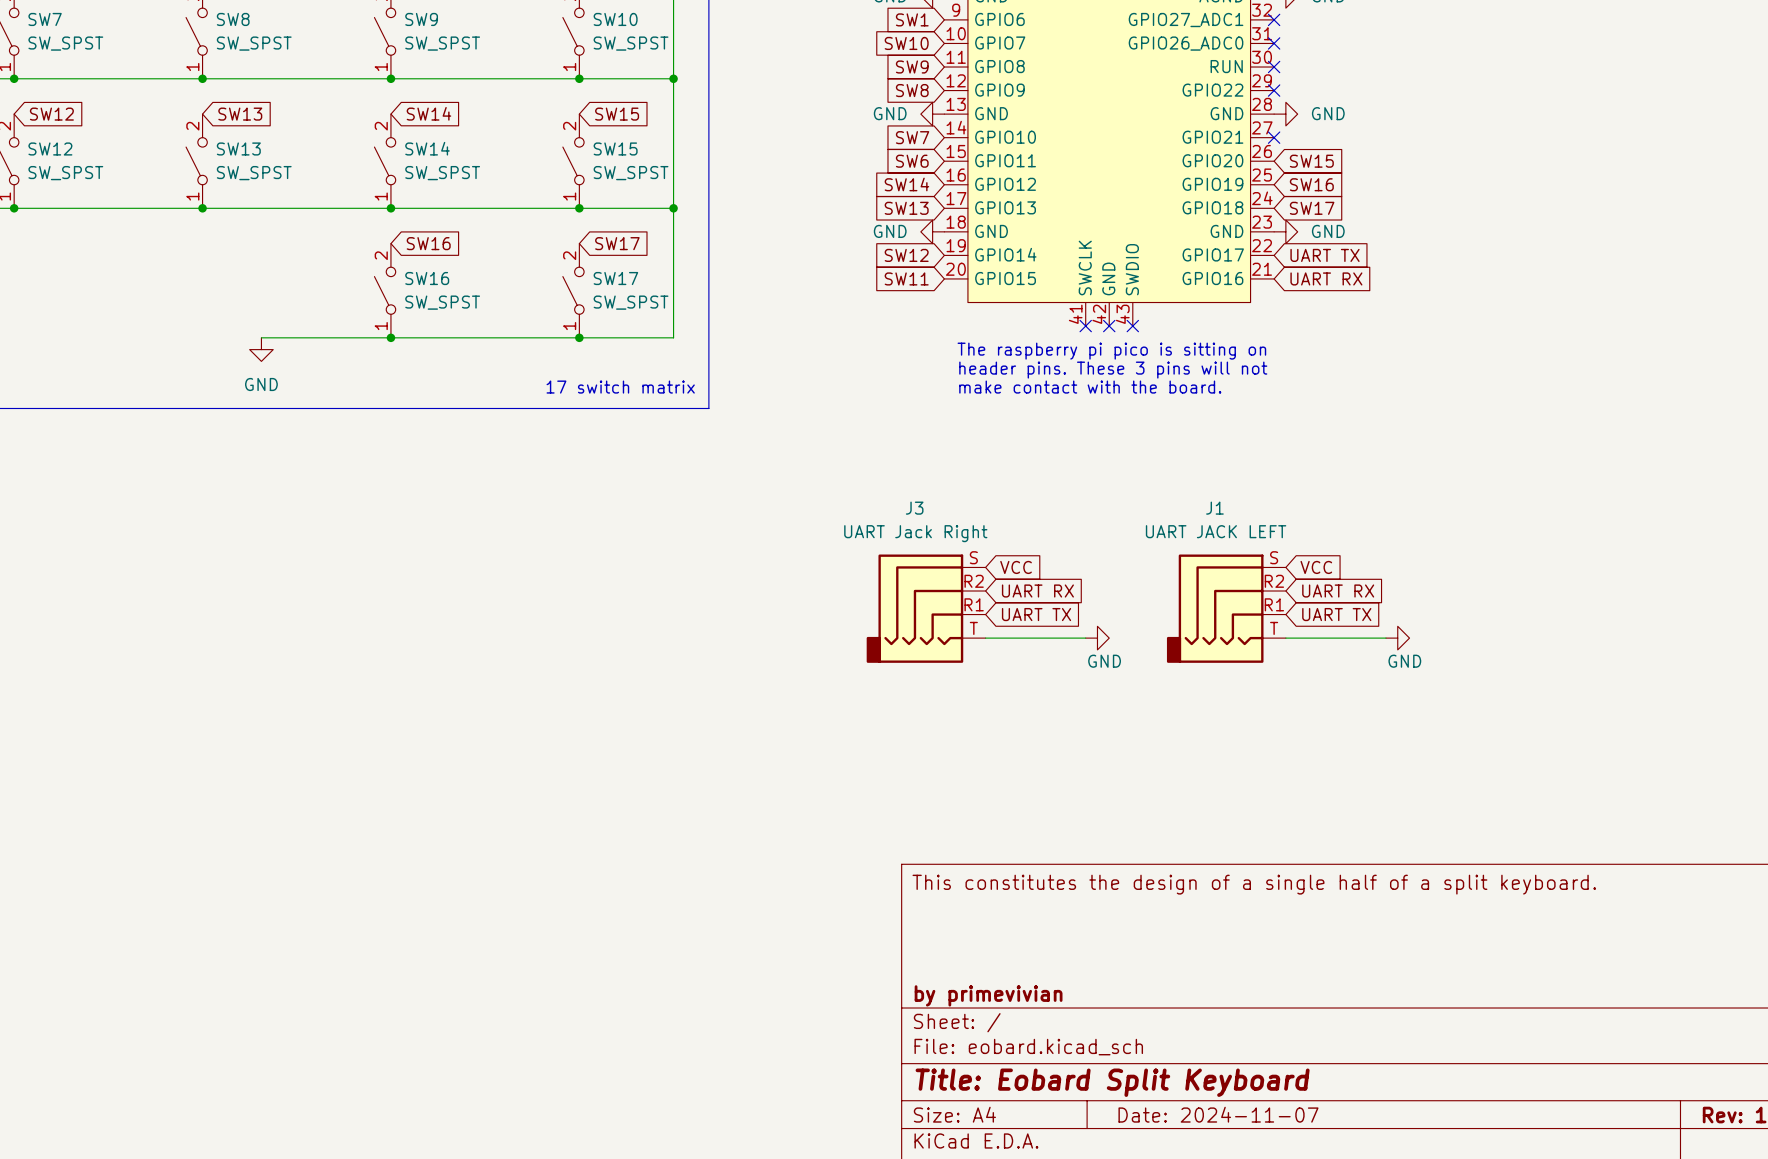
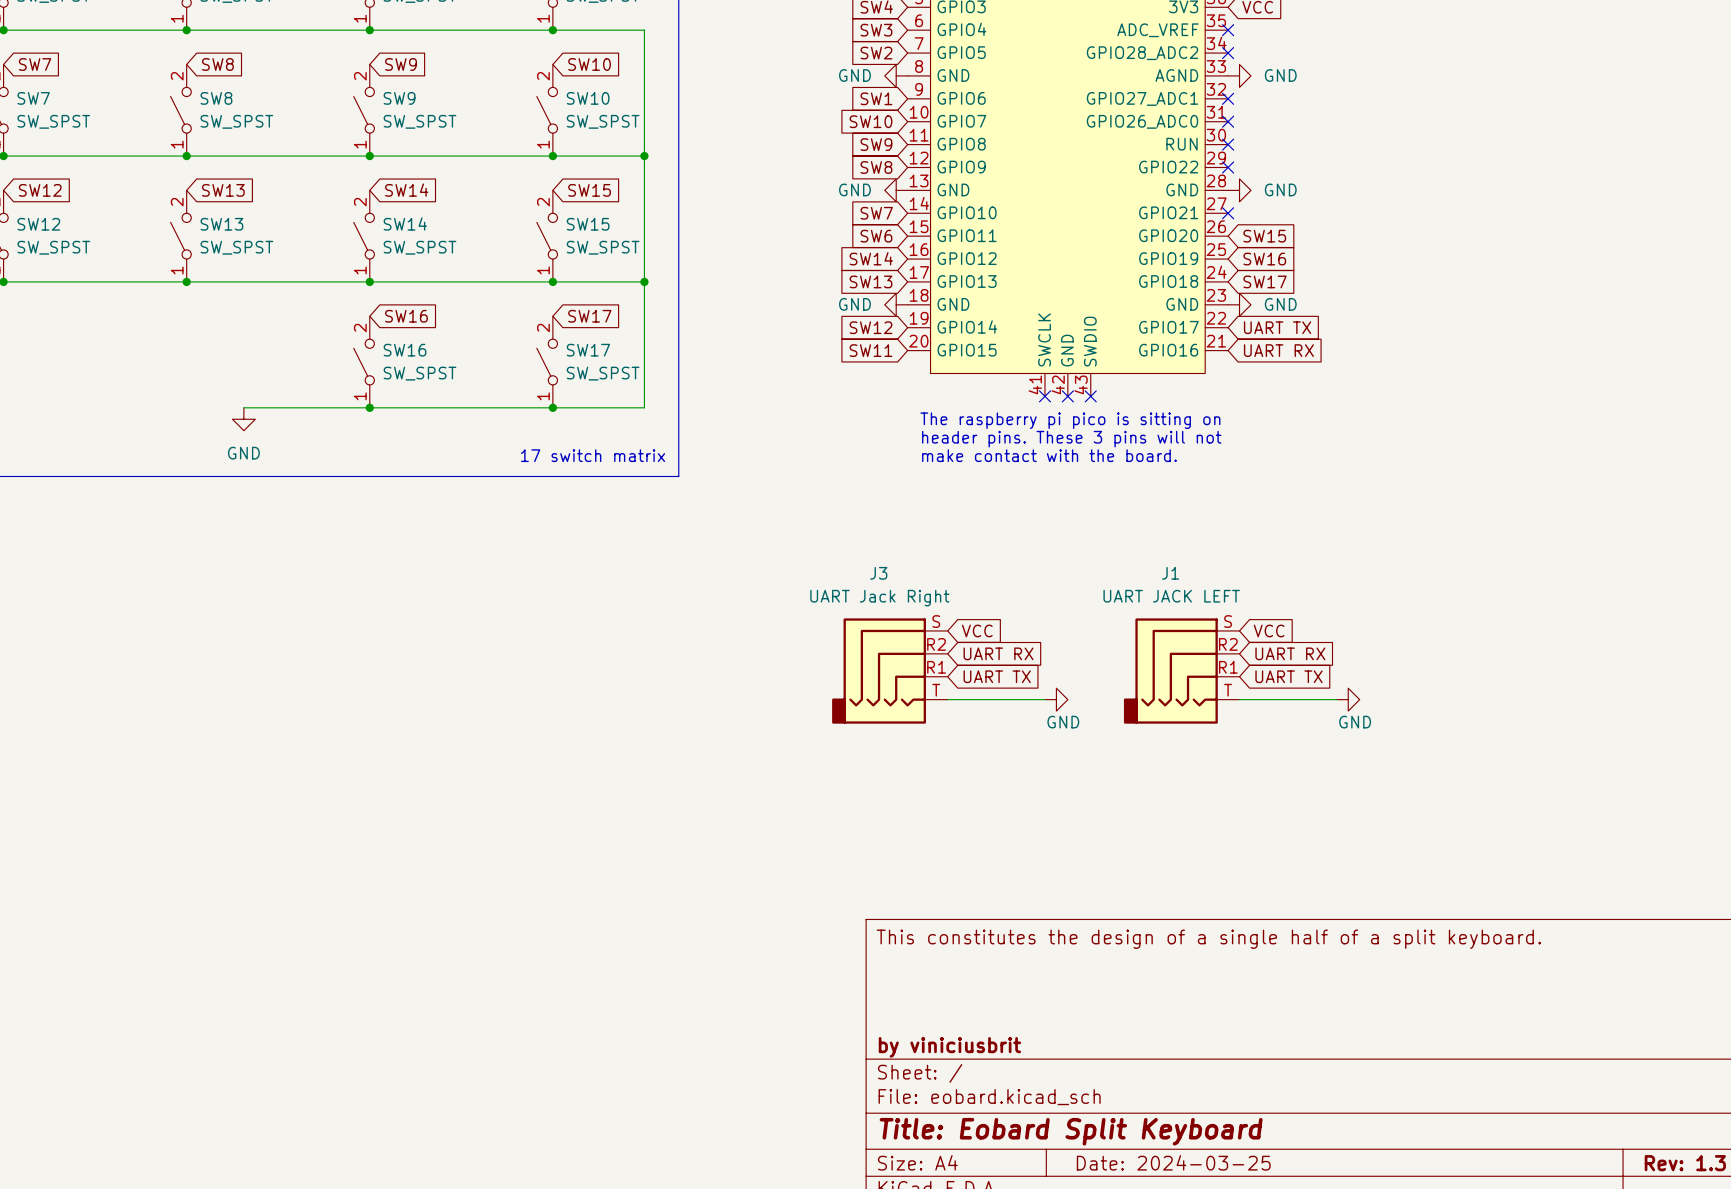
title block: by primevivian (988, 995) -> by viniciusbrit (949, 1047)
title block: Date: 2024-11-07 (1218, 1114) -> Date: 2024-03-25 (1173, 1162)

